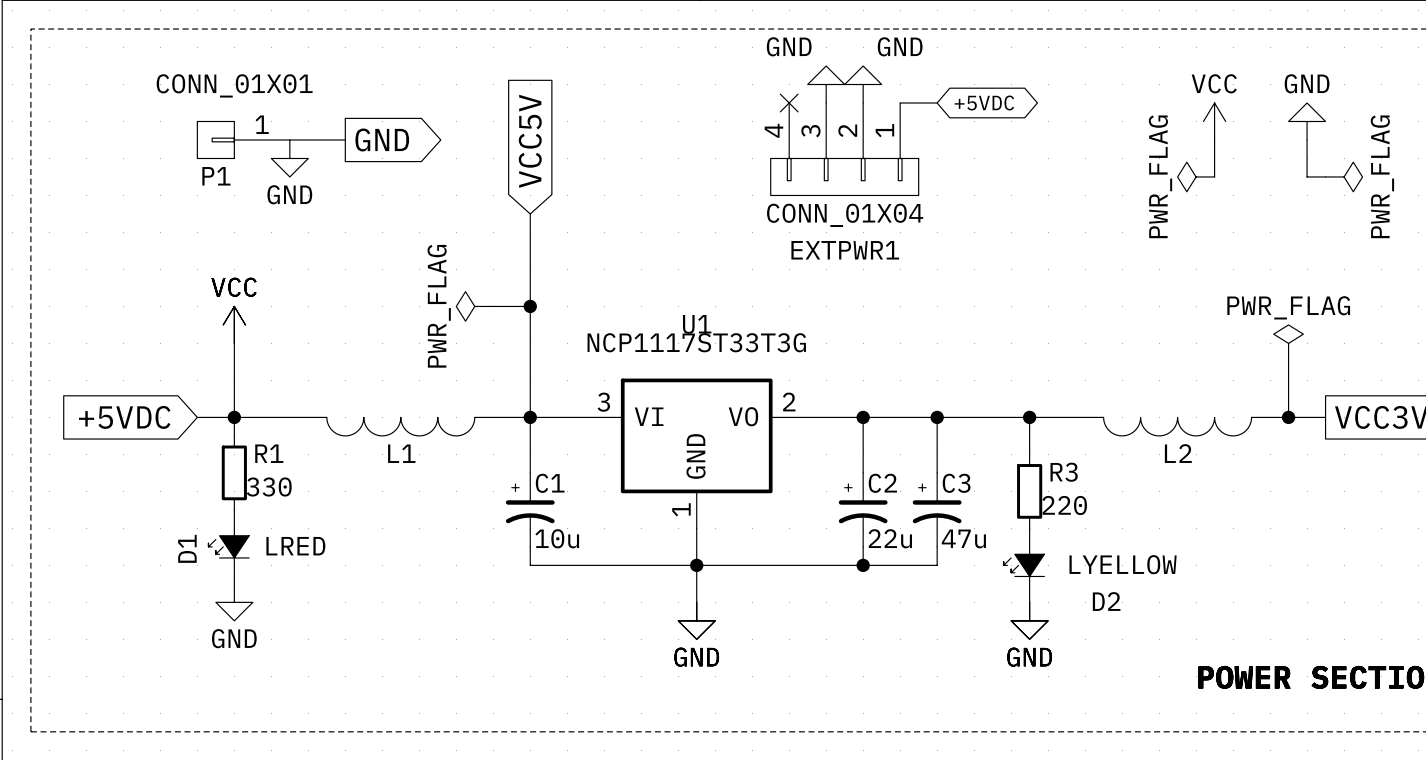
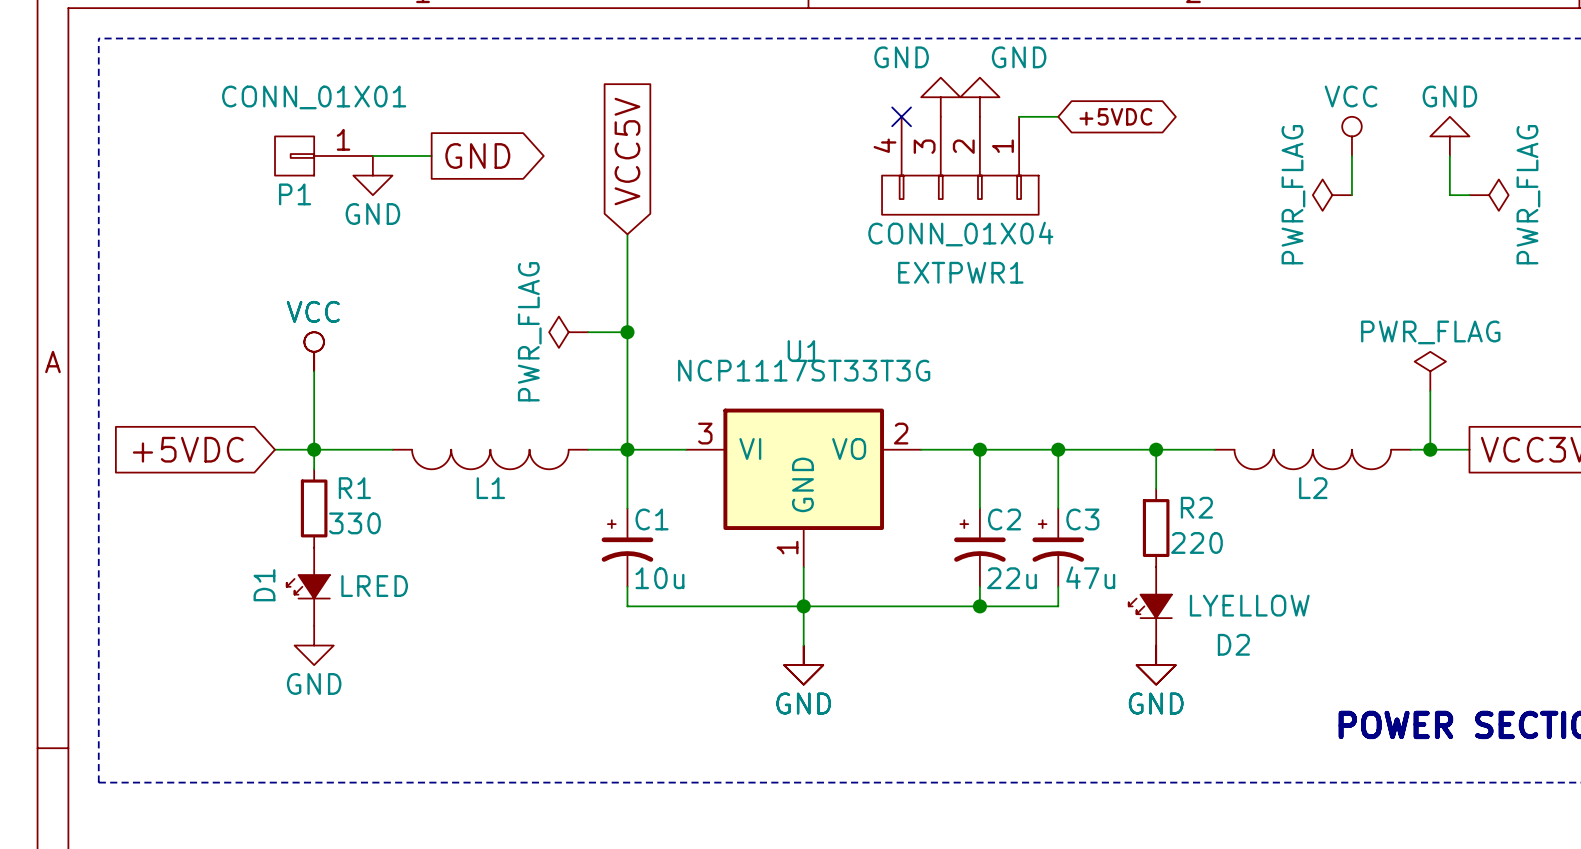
power symbol shape: [1203, 103, 1226, 140] -> [1342, 116, 1362, 156]
power symbol shape: [223, 306, 246, 344] -> [304, 332, 324, 372]
R3 name: R3 (1064, 472) -> R2 (1196, 507)

